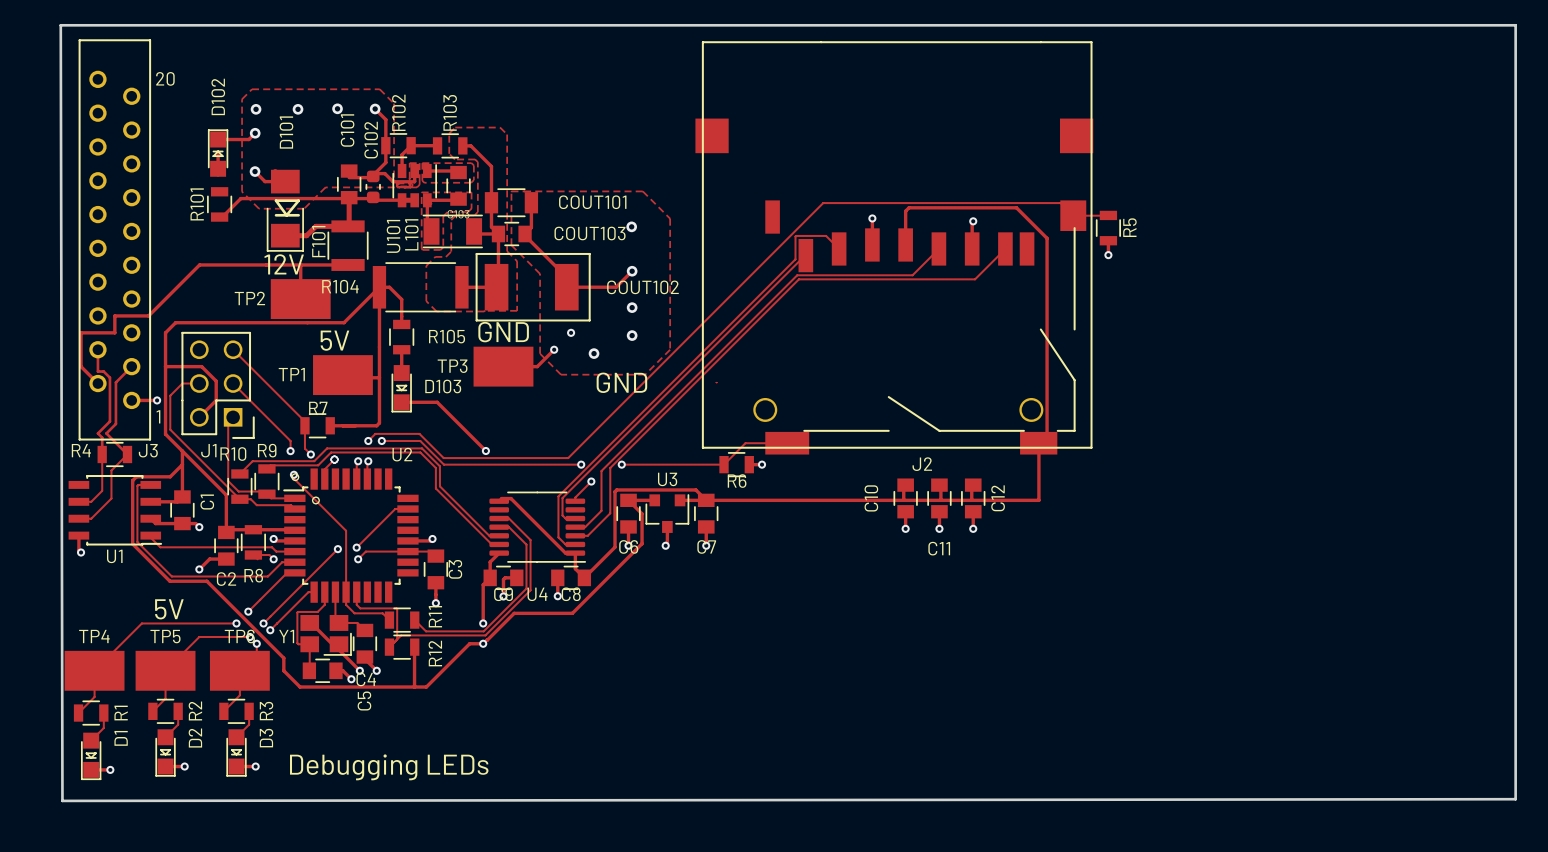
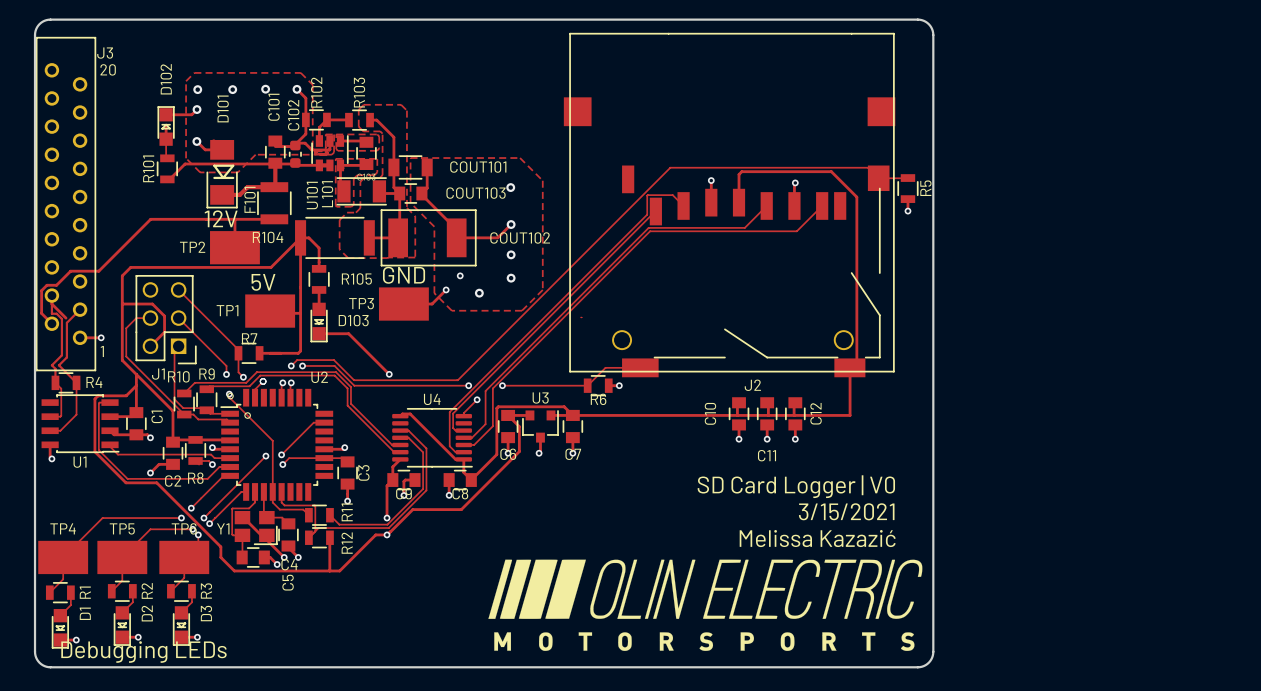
board edge: (79, 25) (60, 25) (62, 800) (1515, 799) (1515, 25) (1120, 25) -> (50, 19) (39, 24) (35, 35) (35, 651) (36, 657) (41, 664) (50, 667) (917, 667) (928, 662) (933, 651) (933, 35) (928, 24) (917, 19)
track: none -> (166, 139) (167, 158)
J3 position: (114, 239) -> (66, 204)
track: (148, 315) (114, 315) (114, 332) (81, 332) (81, 356) -> (108, 261) (98, 271) (70, 271) (56, 285) (46, 285) (41, 290) (41, 313) (51, 323)
track: (97, 349) (97, 371) (103, 371) (109, 377) (109, 421) (97, 433) (102, 437) (102, 490) (92, 500) -> (51, 304) (51, 313) (56, 313) (61, 318) (61, 355) (51, 365) (55, 368) (55, 382) (61, 388) (61, 415)
track: (131, 366) (115, 382) (115, 423) (106, 433) (127, 454) (111, 470) (110, 499) -> (80, 309) (66, 322) (66, 357) (58, 365) (76, 382) (76, 414)
text: GND (621, 382) -> none
track: (131, 400) (157, 400) -> (80, 337) (101, 337)
via position: (157, 400) -> (101, 337)
R4 name position: R4 (81, 450) -> R4 (94, 382)
J3 name position: J3 (148, 450) -> J3 (105, 53)
R4 position: (114, 454) -> (66, 382)
text: none -> SD Card Logger | V0 (796, 486)
U4 name position: U4 (537, 594) -> U4 (432, 399)
text: 5V (169, 609) -> none
text: none -> 3/15/2021 (846, 511)
text: none -> Melissa Kazazić (817, 538)
drawing: none -> [488, 559, 923, 651]
text position: Debugging LEDs (389, 767) -> Debugging LEDs (143, 652)

